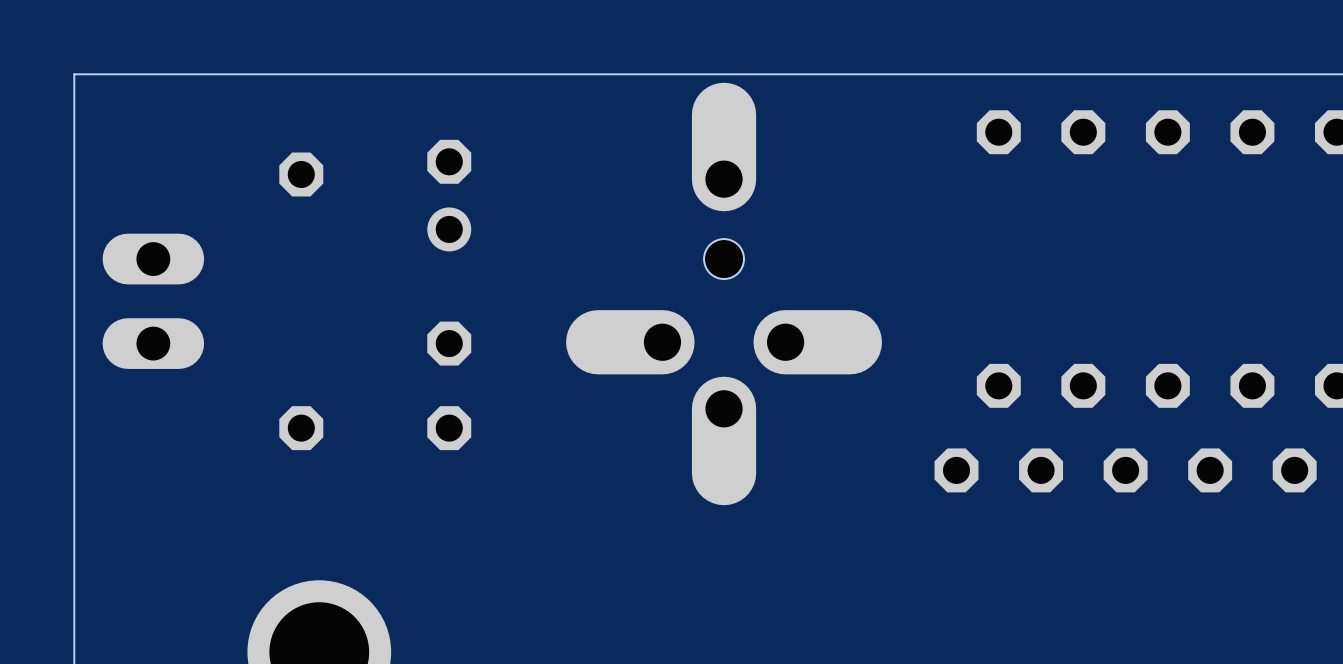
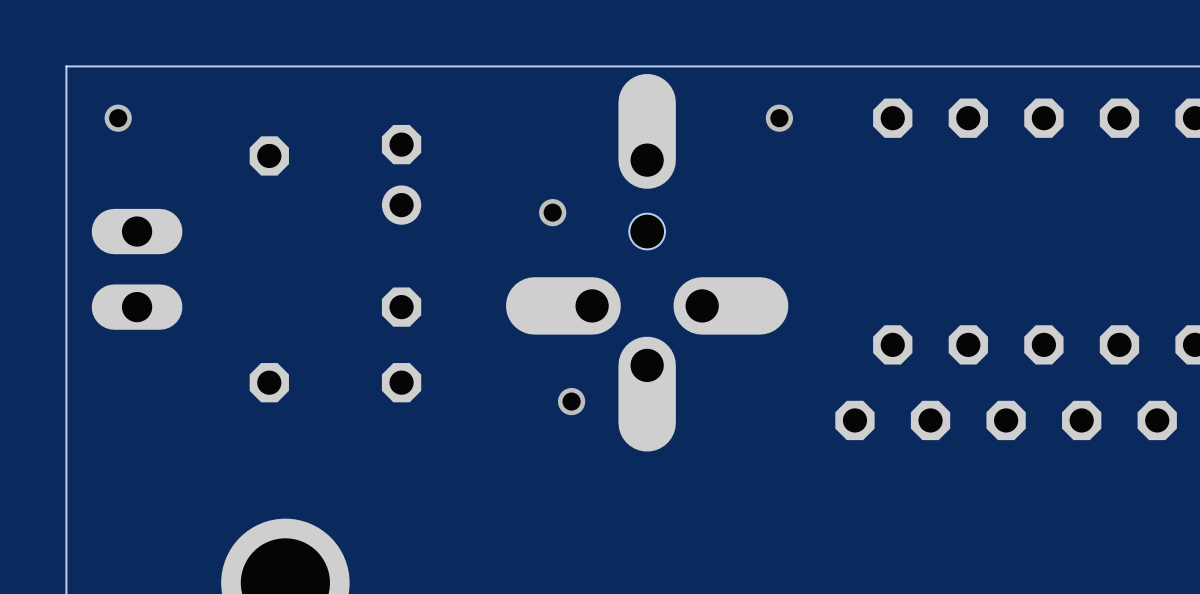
via: none -> (118, 118)
via: none -> (779, 118)
via: none -> (552, 212)
via: none -> (571, 401)

